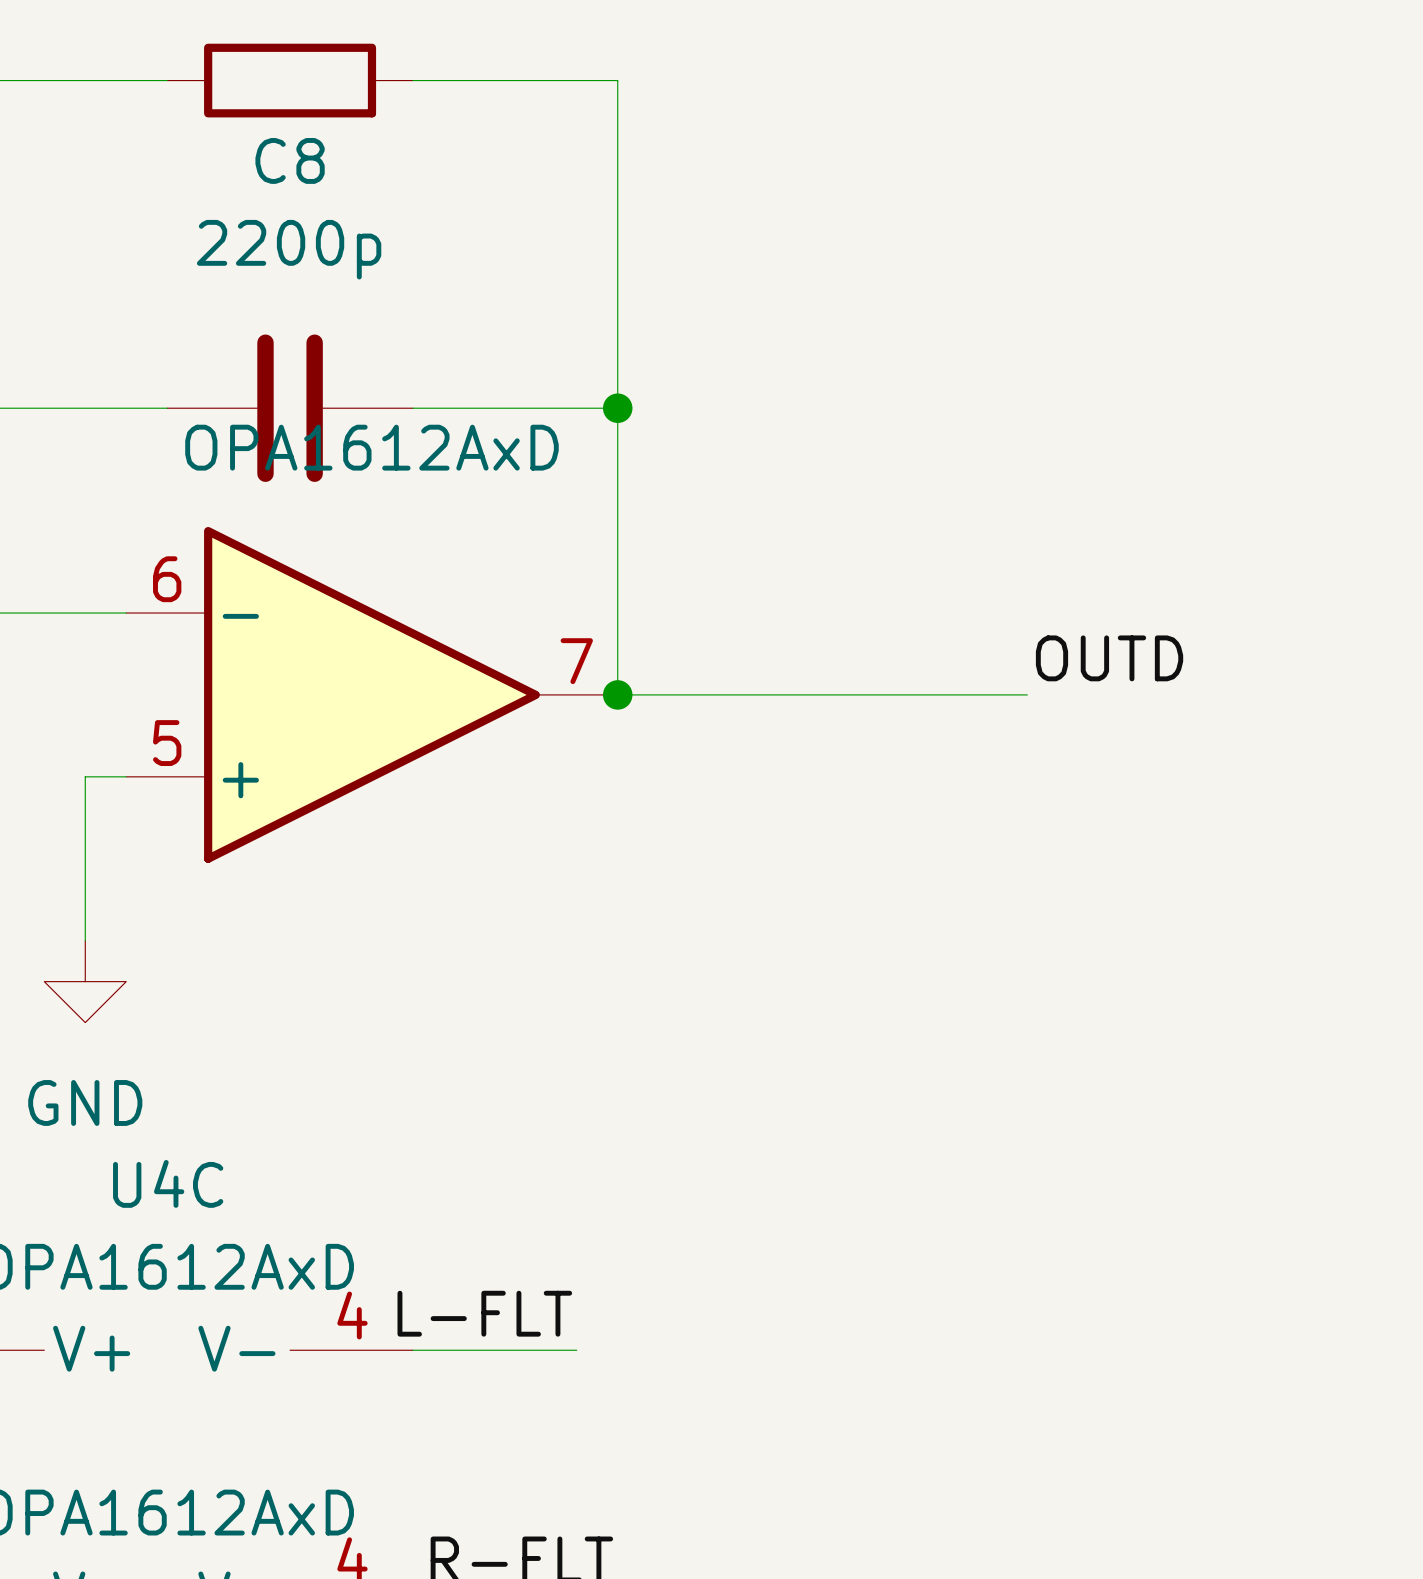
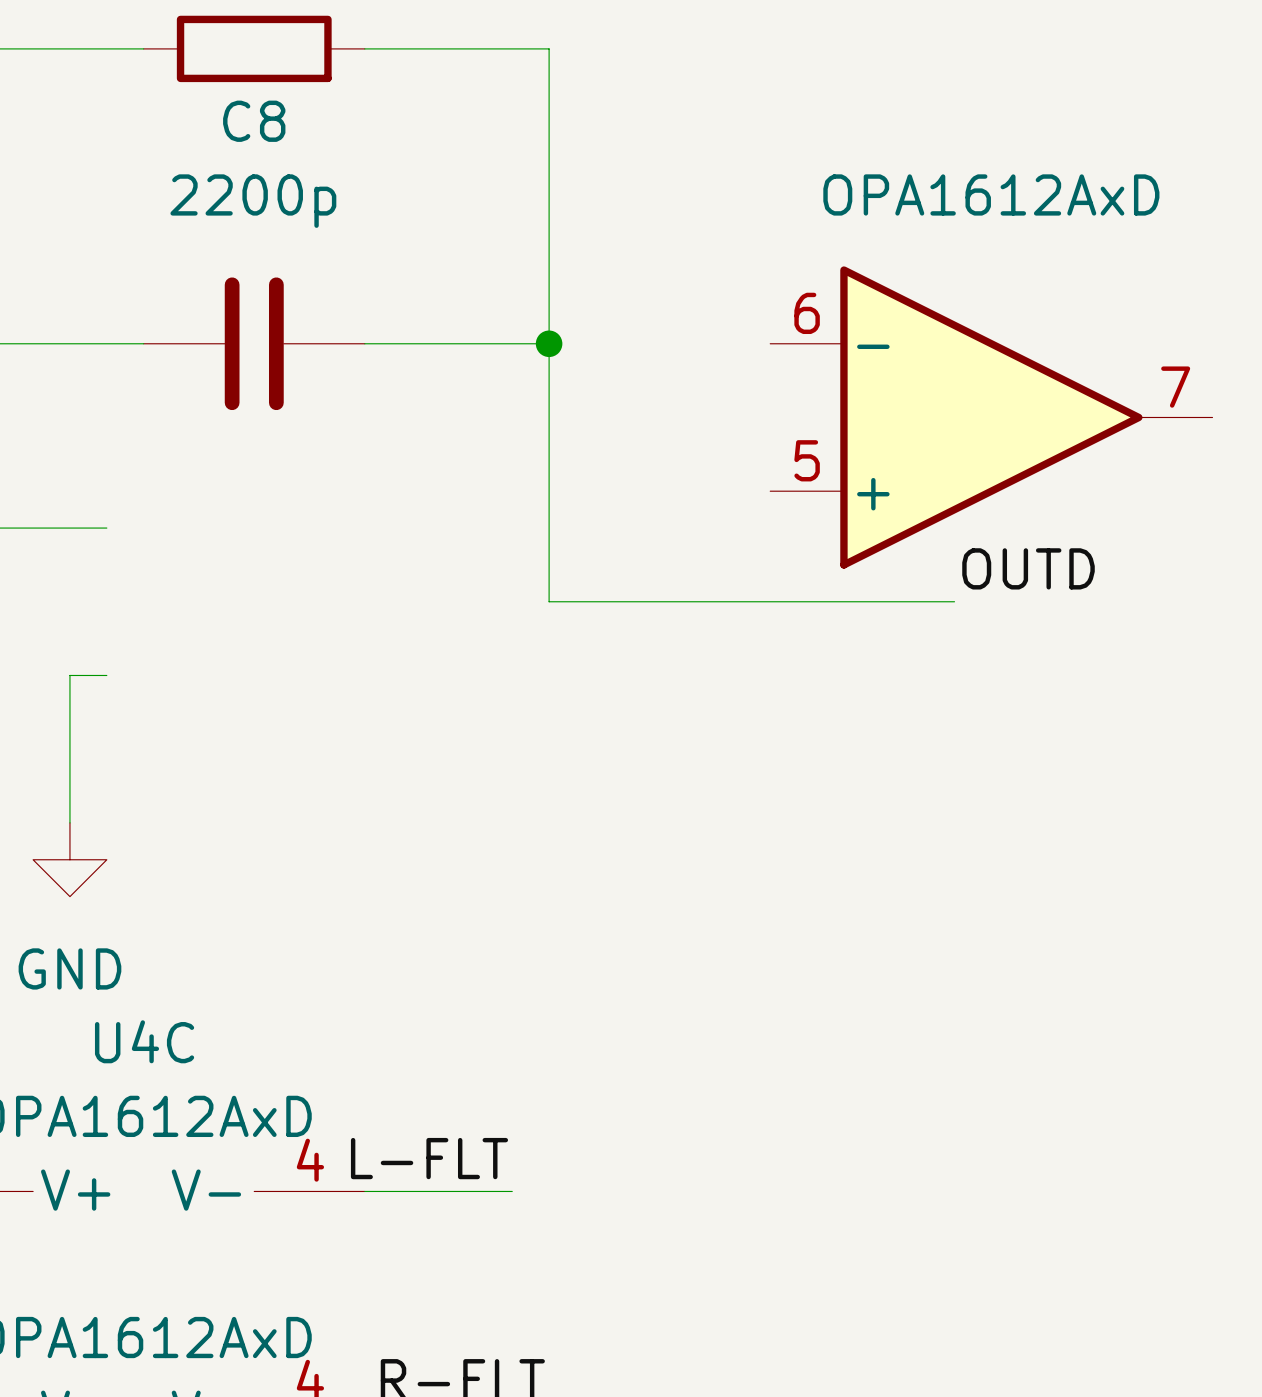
label position: OUTD (1109, 658) -> OUTD (1028, 568)
part position: (371, 694) -> (991, 417)
junction: (617, 694) -> none
wire: none -> (917, 601) (954, 601)

